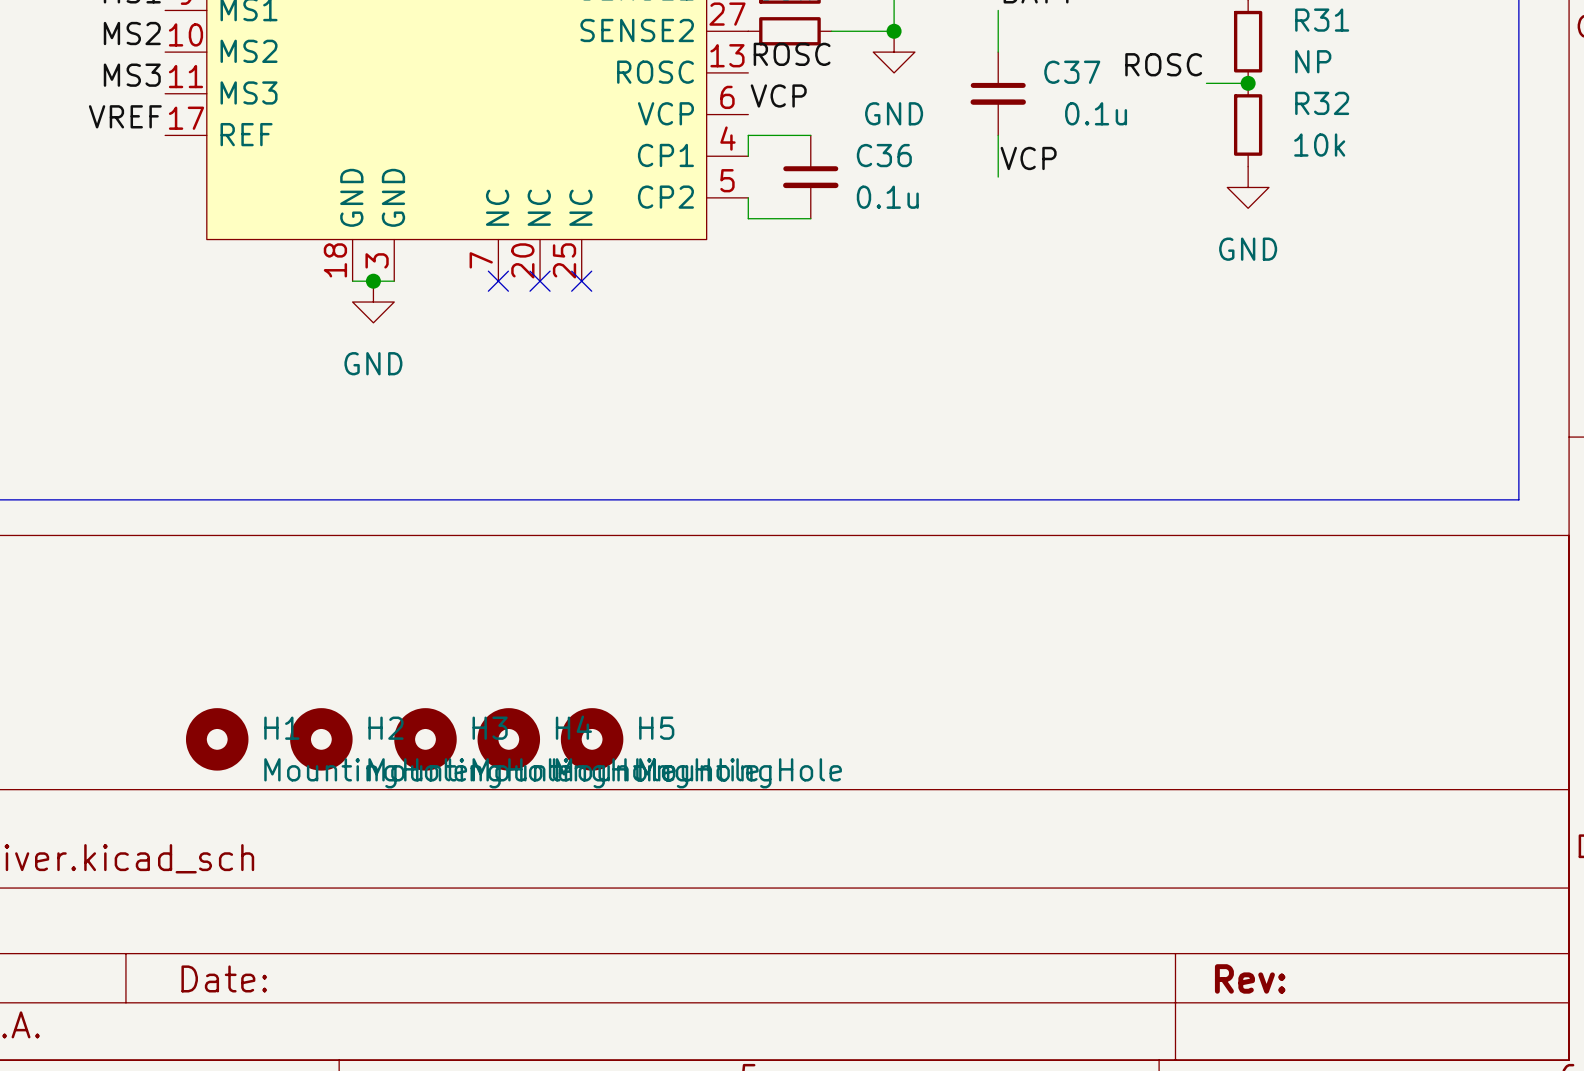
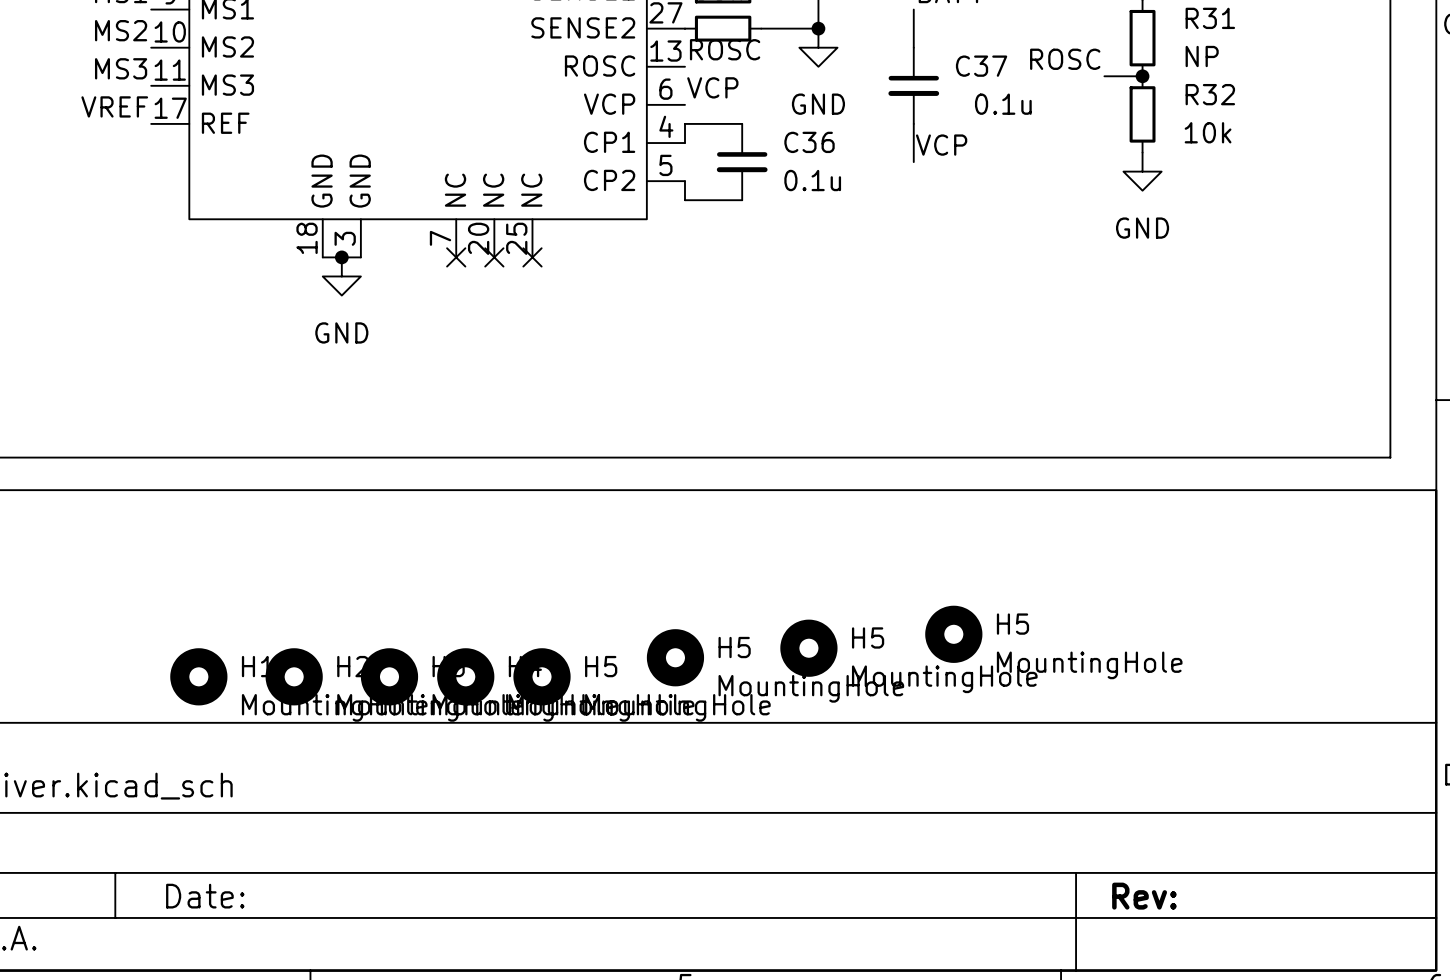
H5: none -> MountingHole (953, 634)
H5: none -> MountingHole (808, 648)
H5: none -> MountingHole (675, 657)

